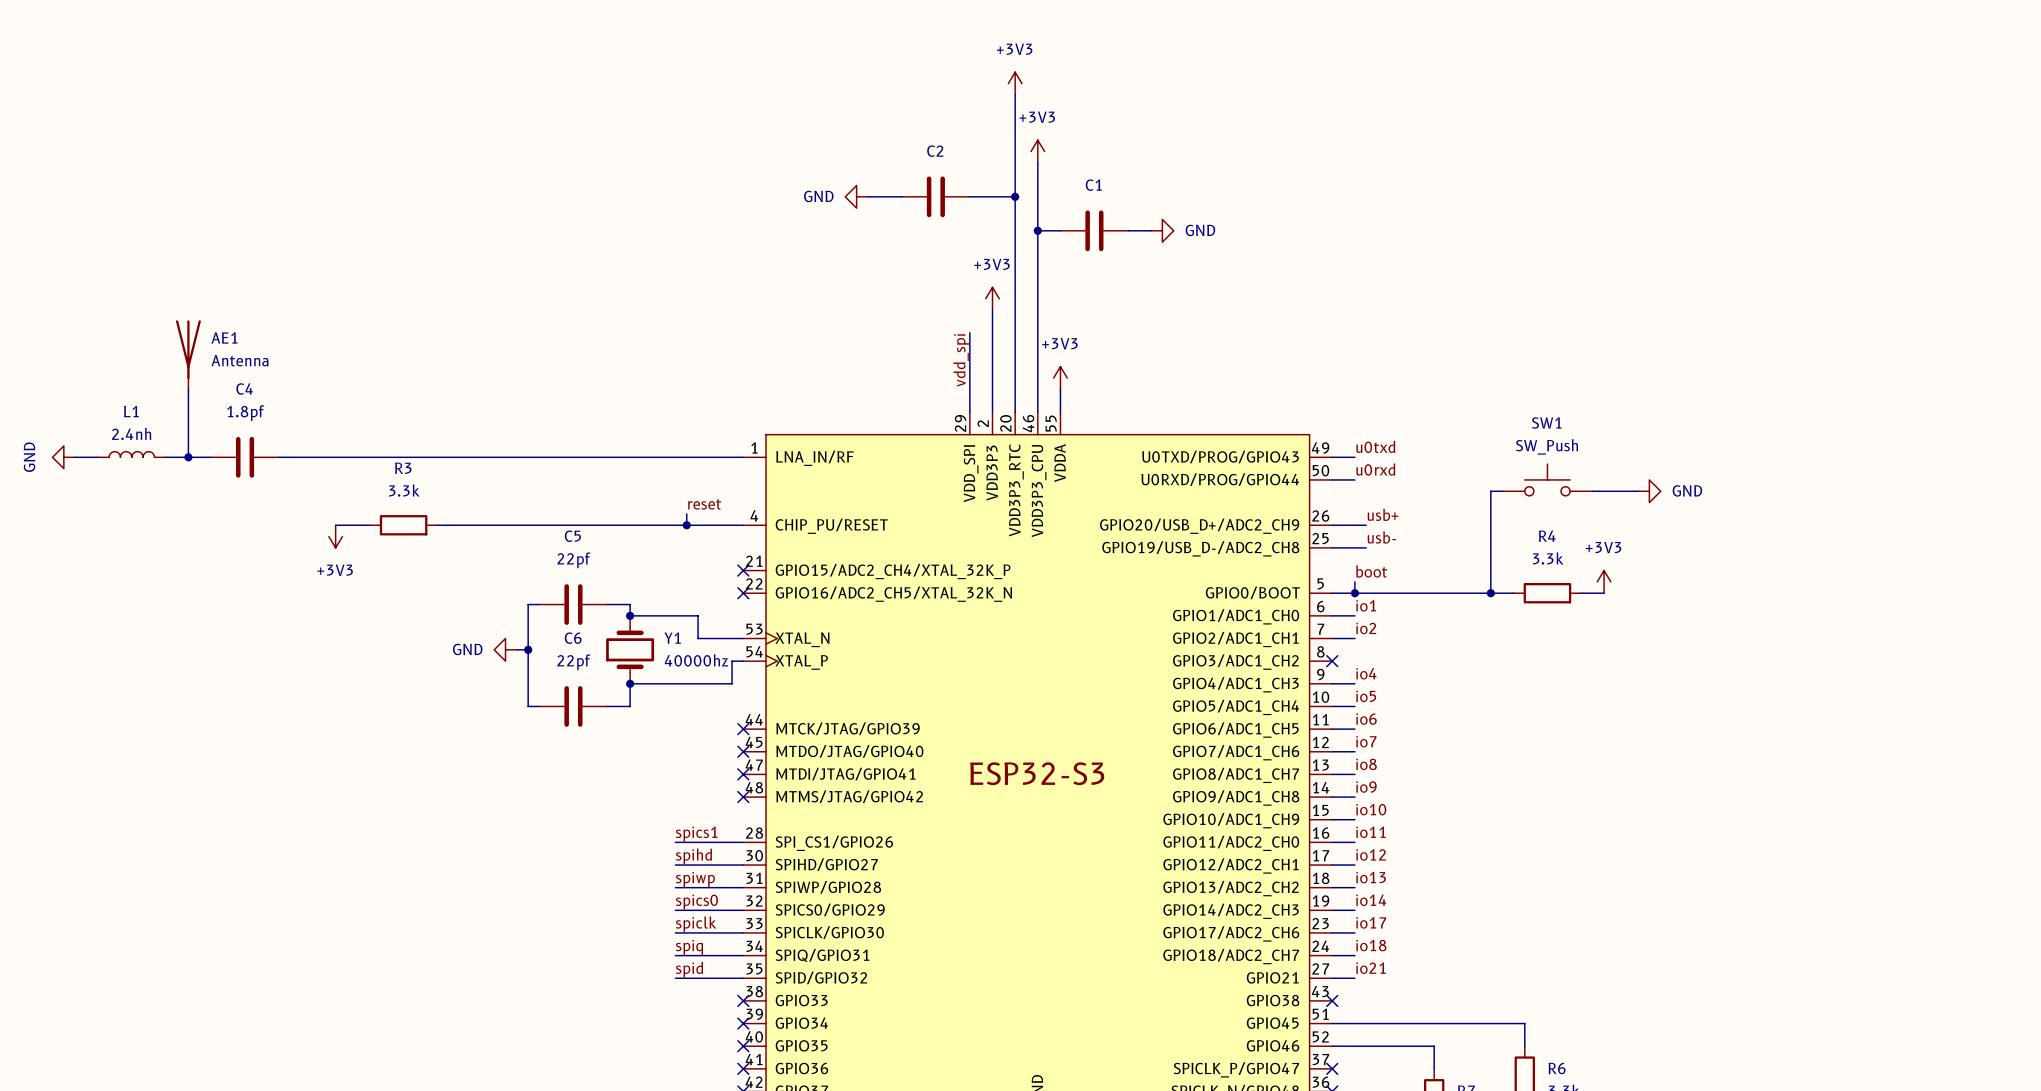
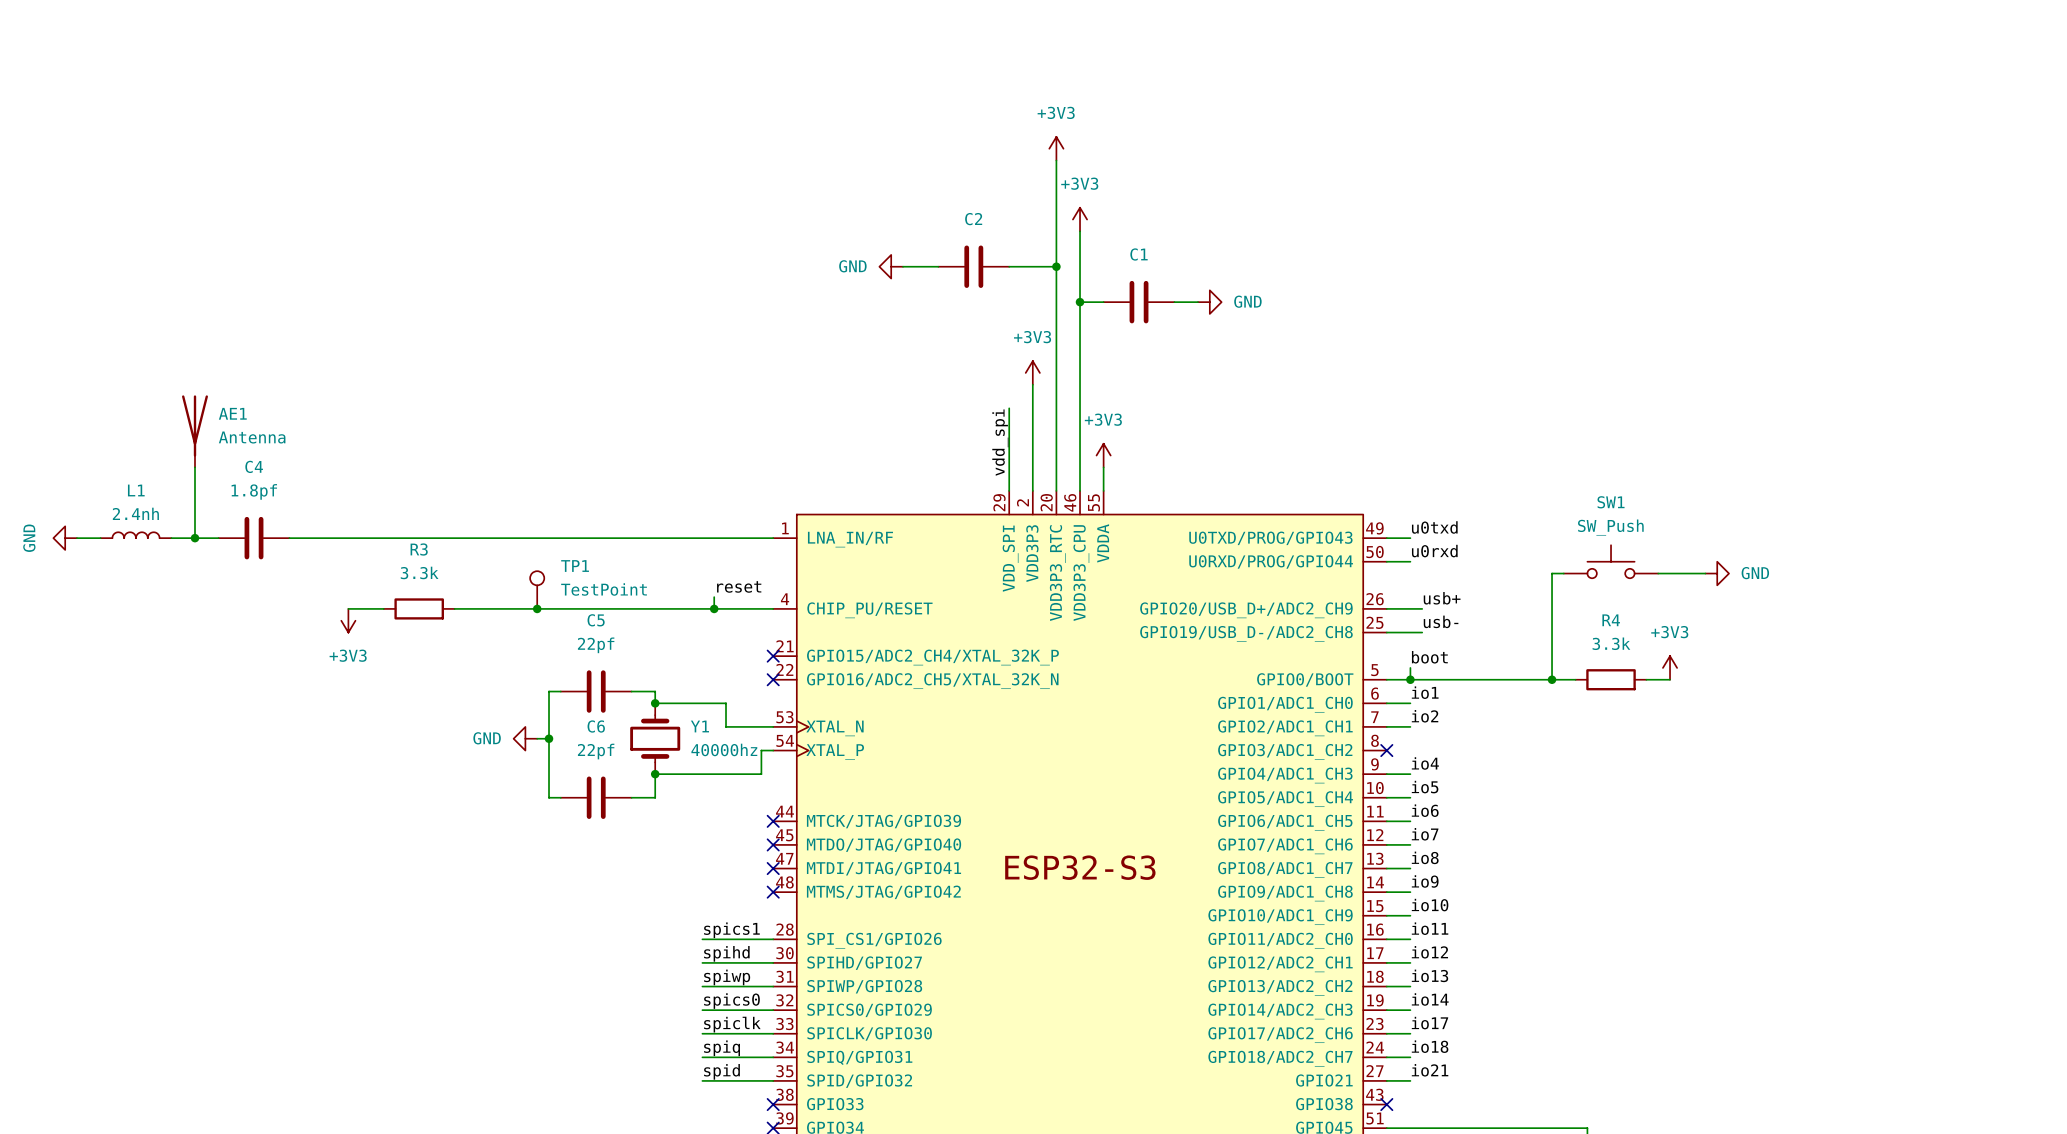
TP1: none -> TestPoint (537, 590)
junction: none -> (537, 608)

